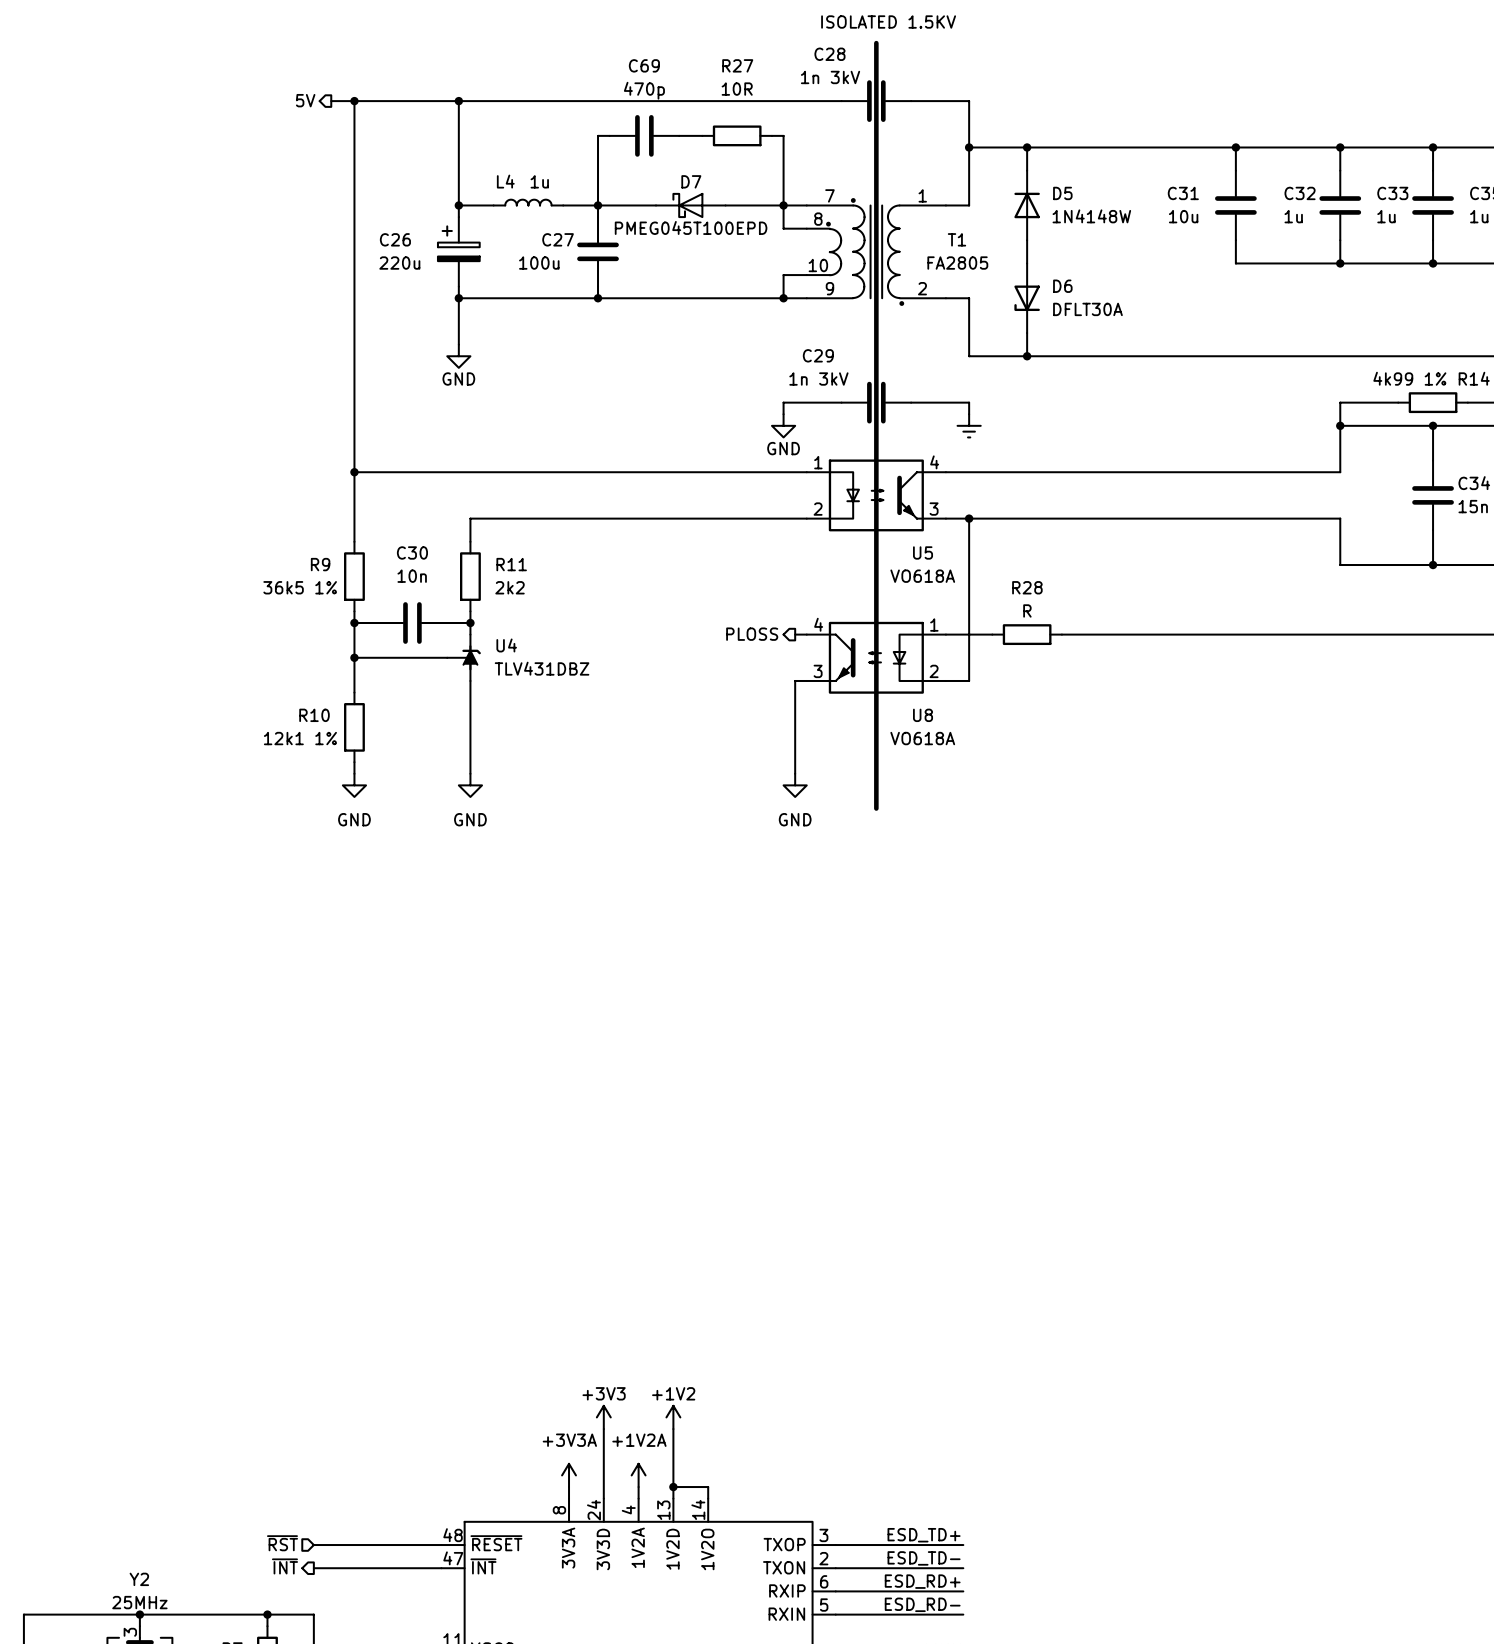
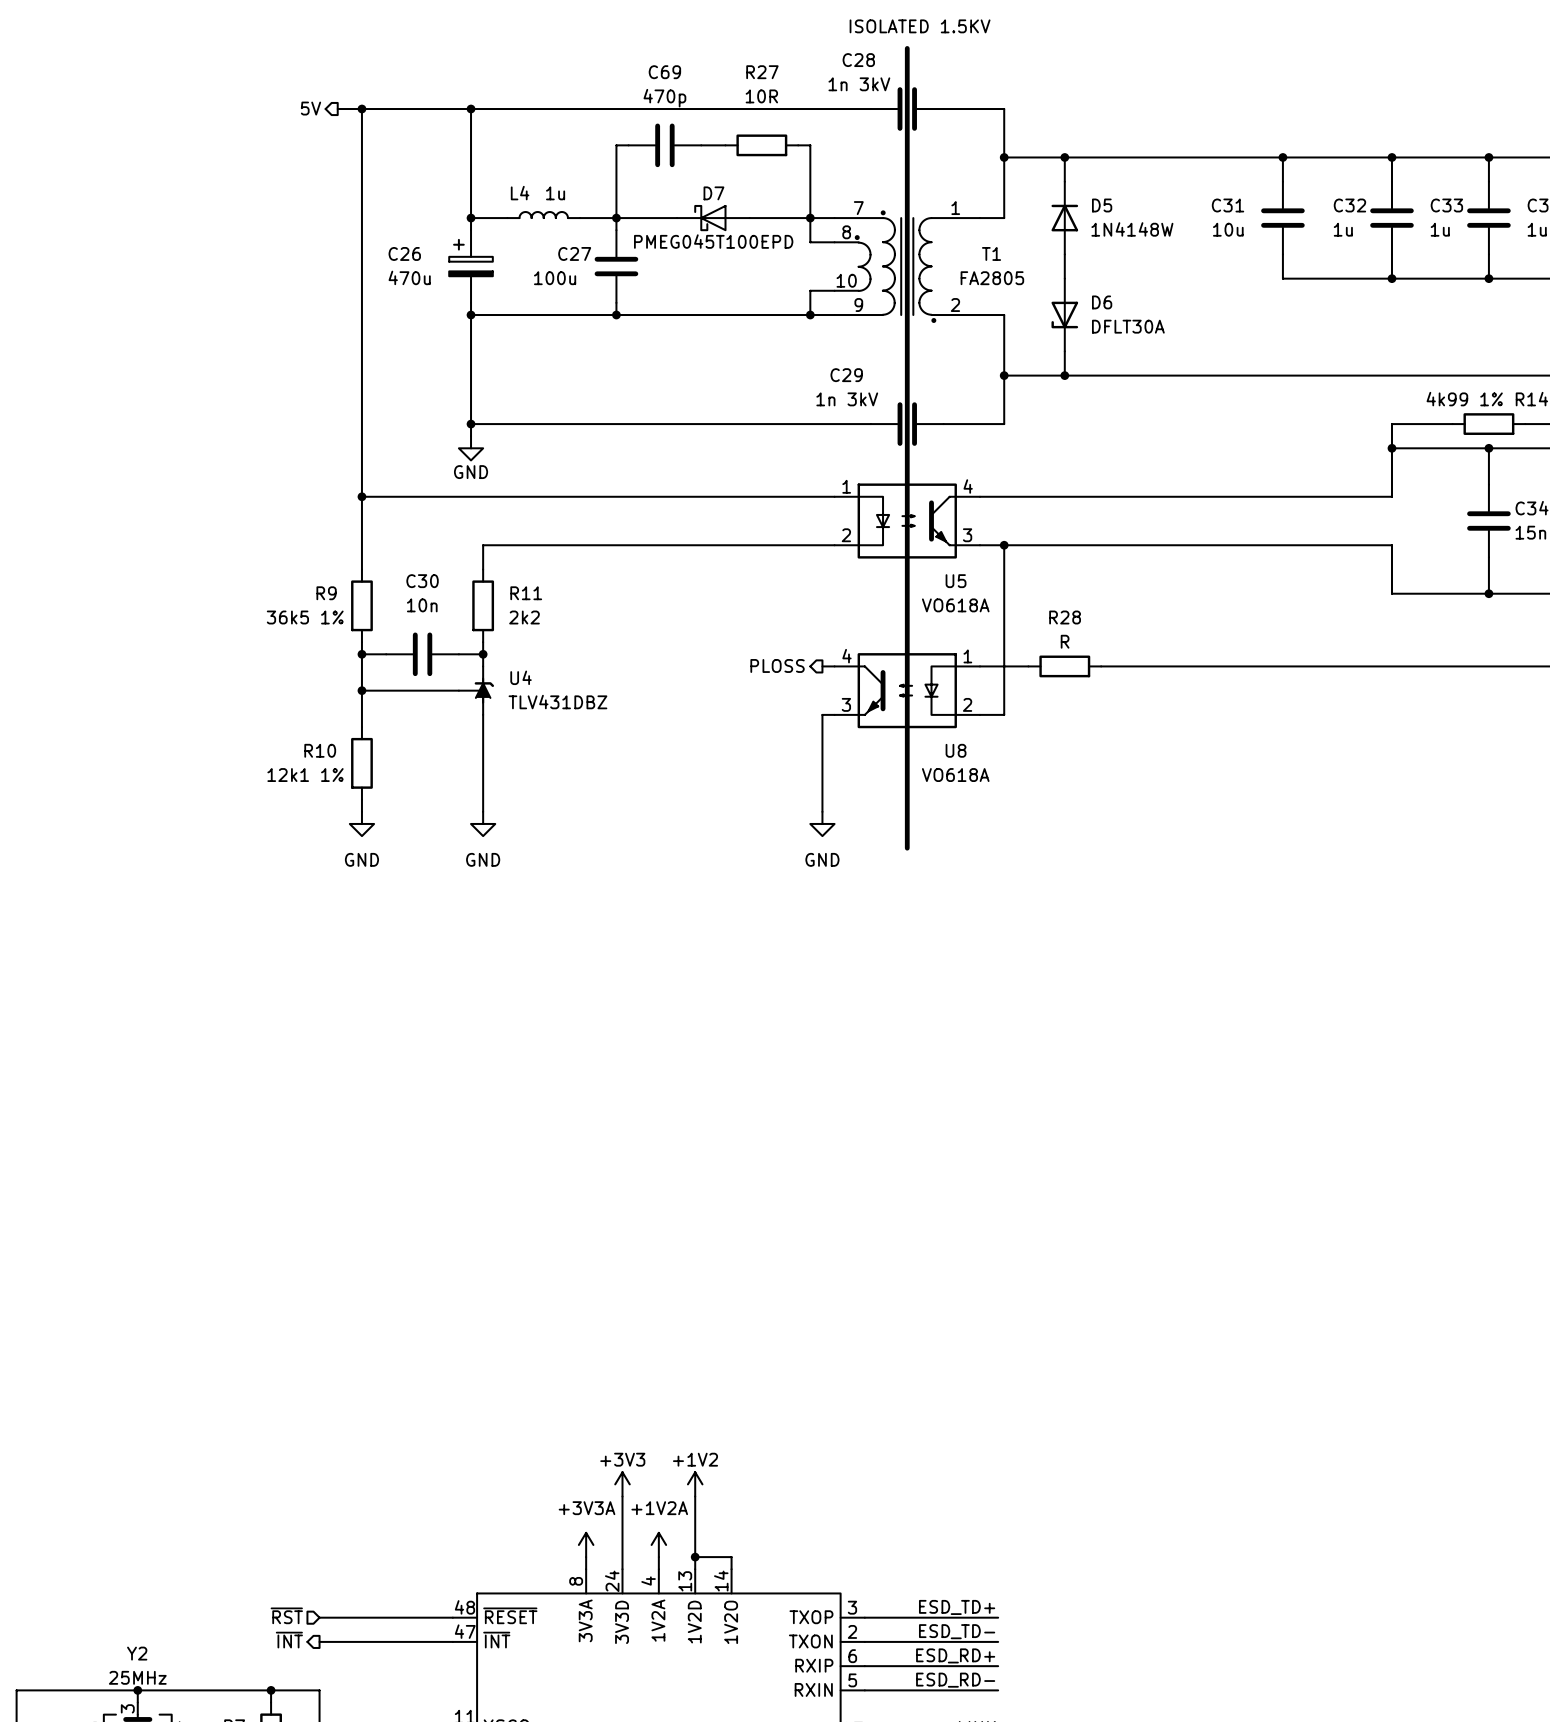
C26 value: 220u (399, 263) -> 470u (409, 277)
wire: none -> (471, 363) (471, 436)
power symbol position: GND (458, 356) -> GND (471, 448)
junction: none -> (1004, 375)
junction: none -> (471, 424)
wire: (783, 402) (783, 414) -> (810, 424) (471, 424)
wire: (969, 402) (969, 414) -> (1004, 424) (1004, 375)
power symbol: GND (783, 425) -> none
power symbol: (969, 425) -> none

